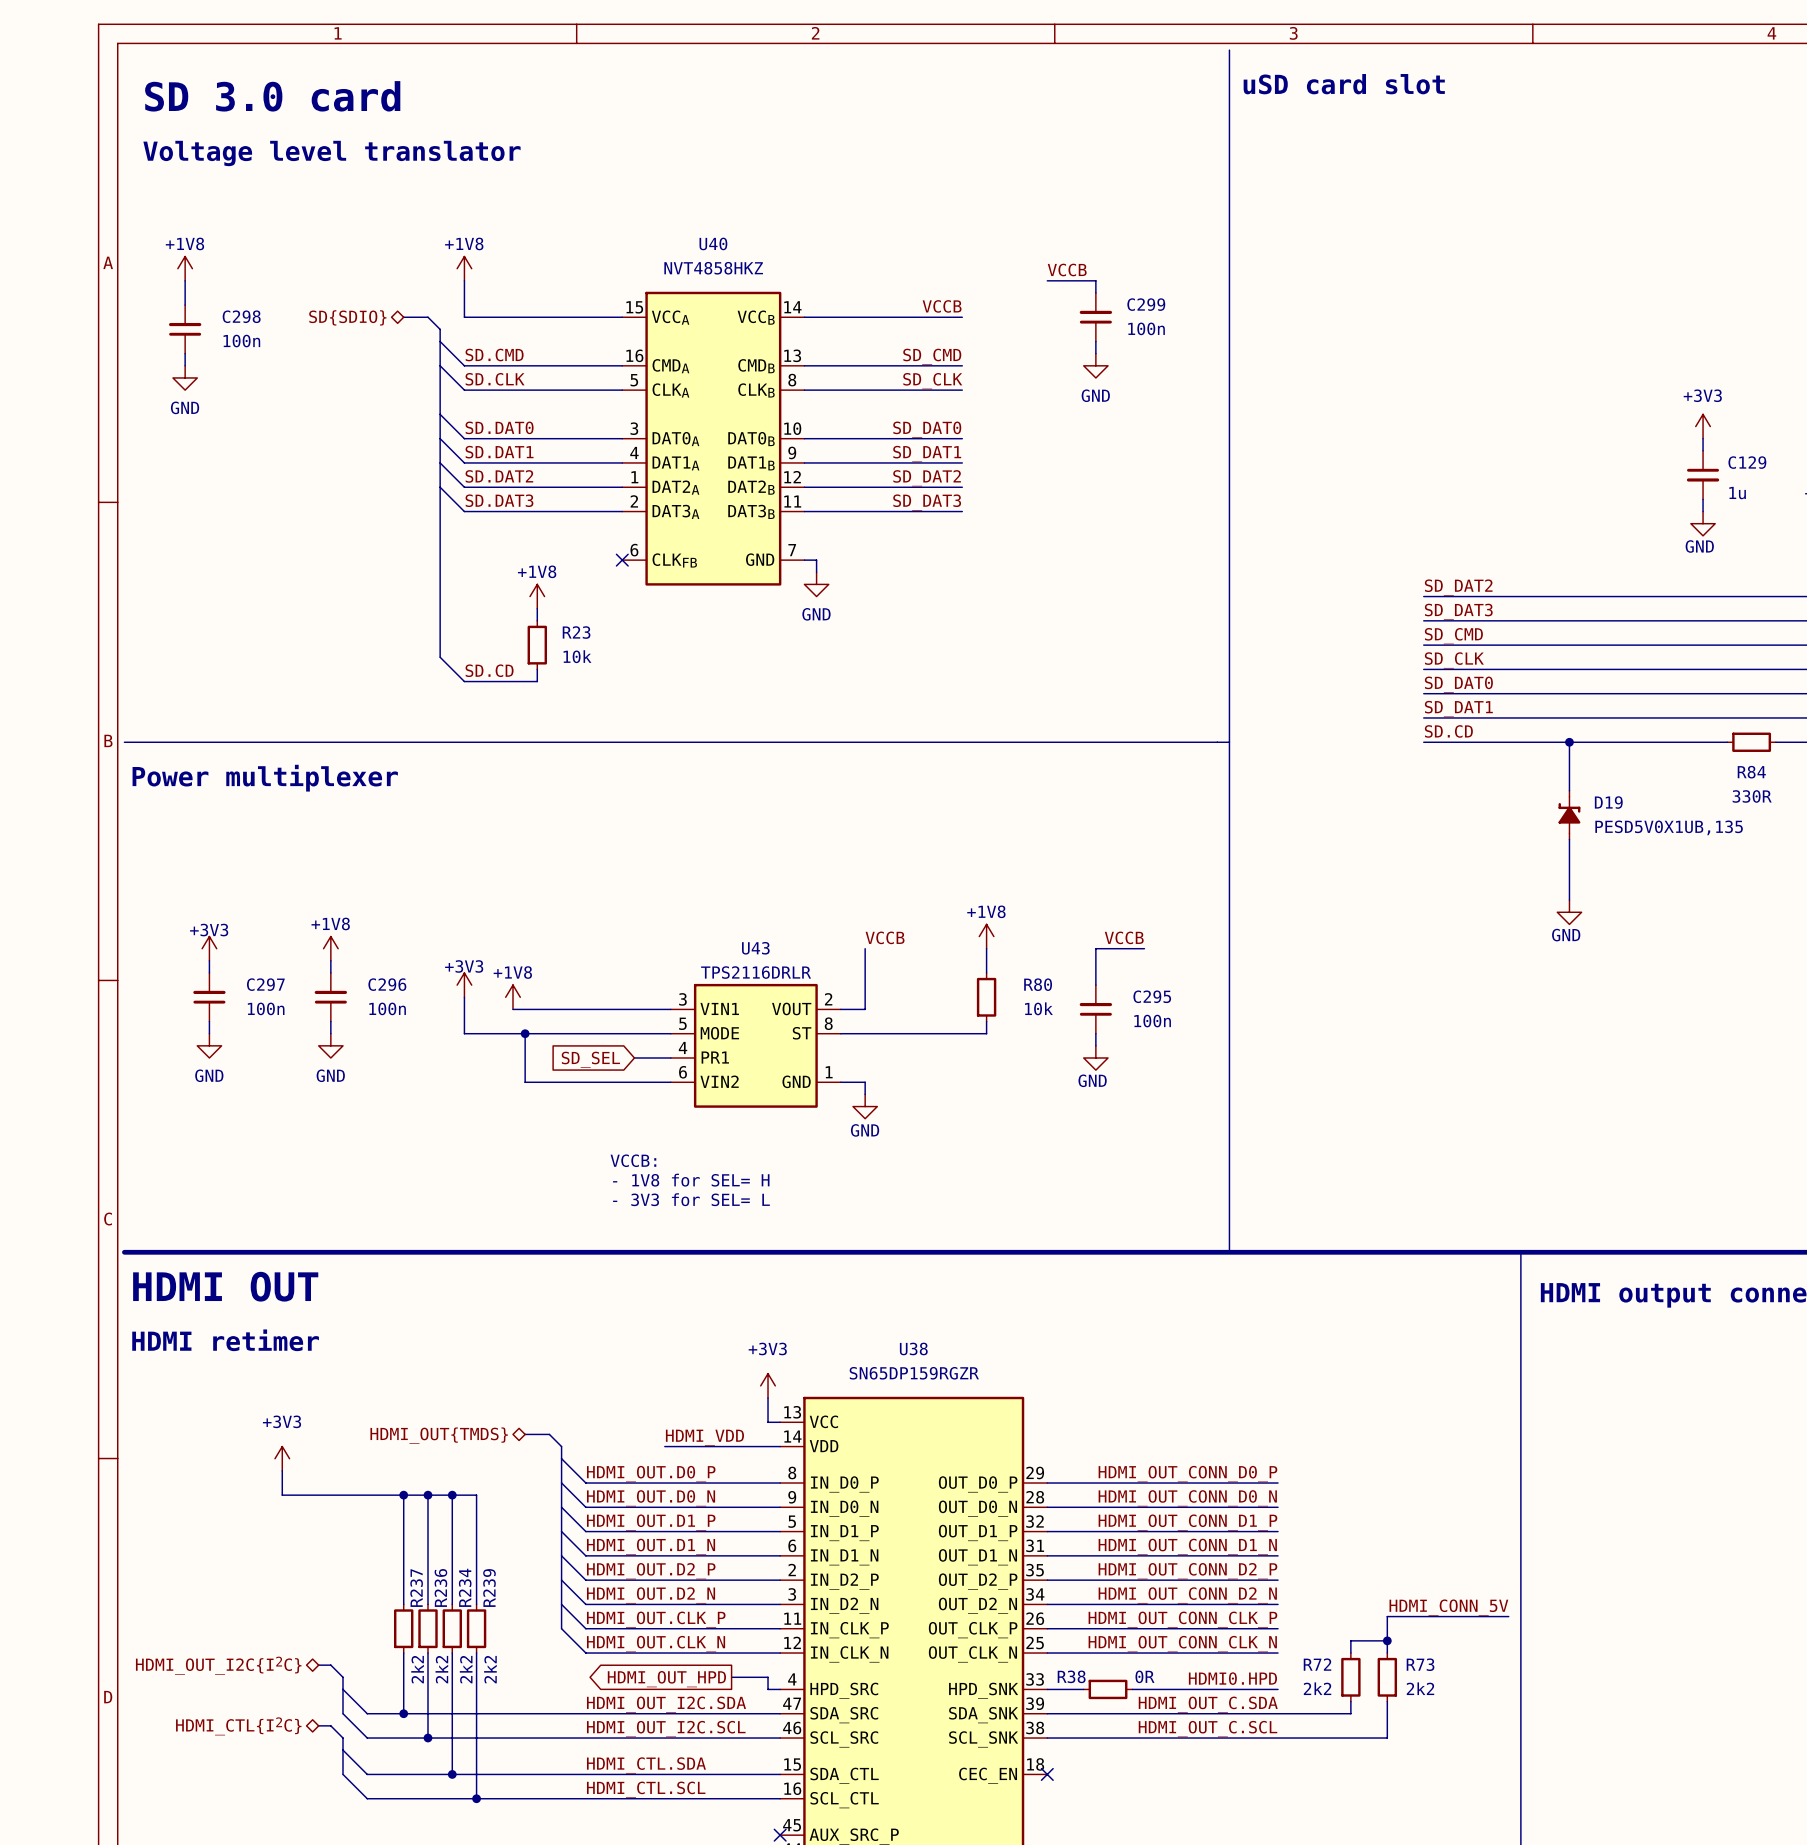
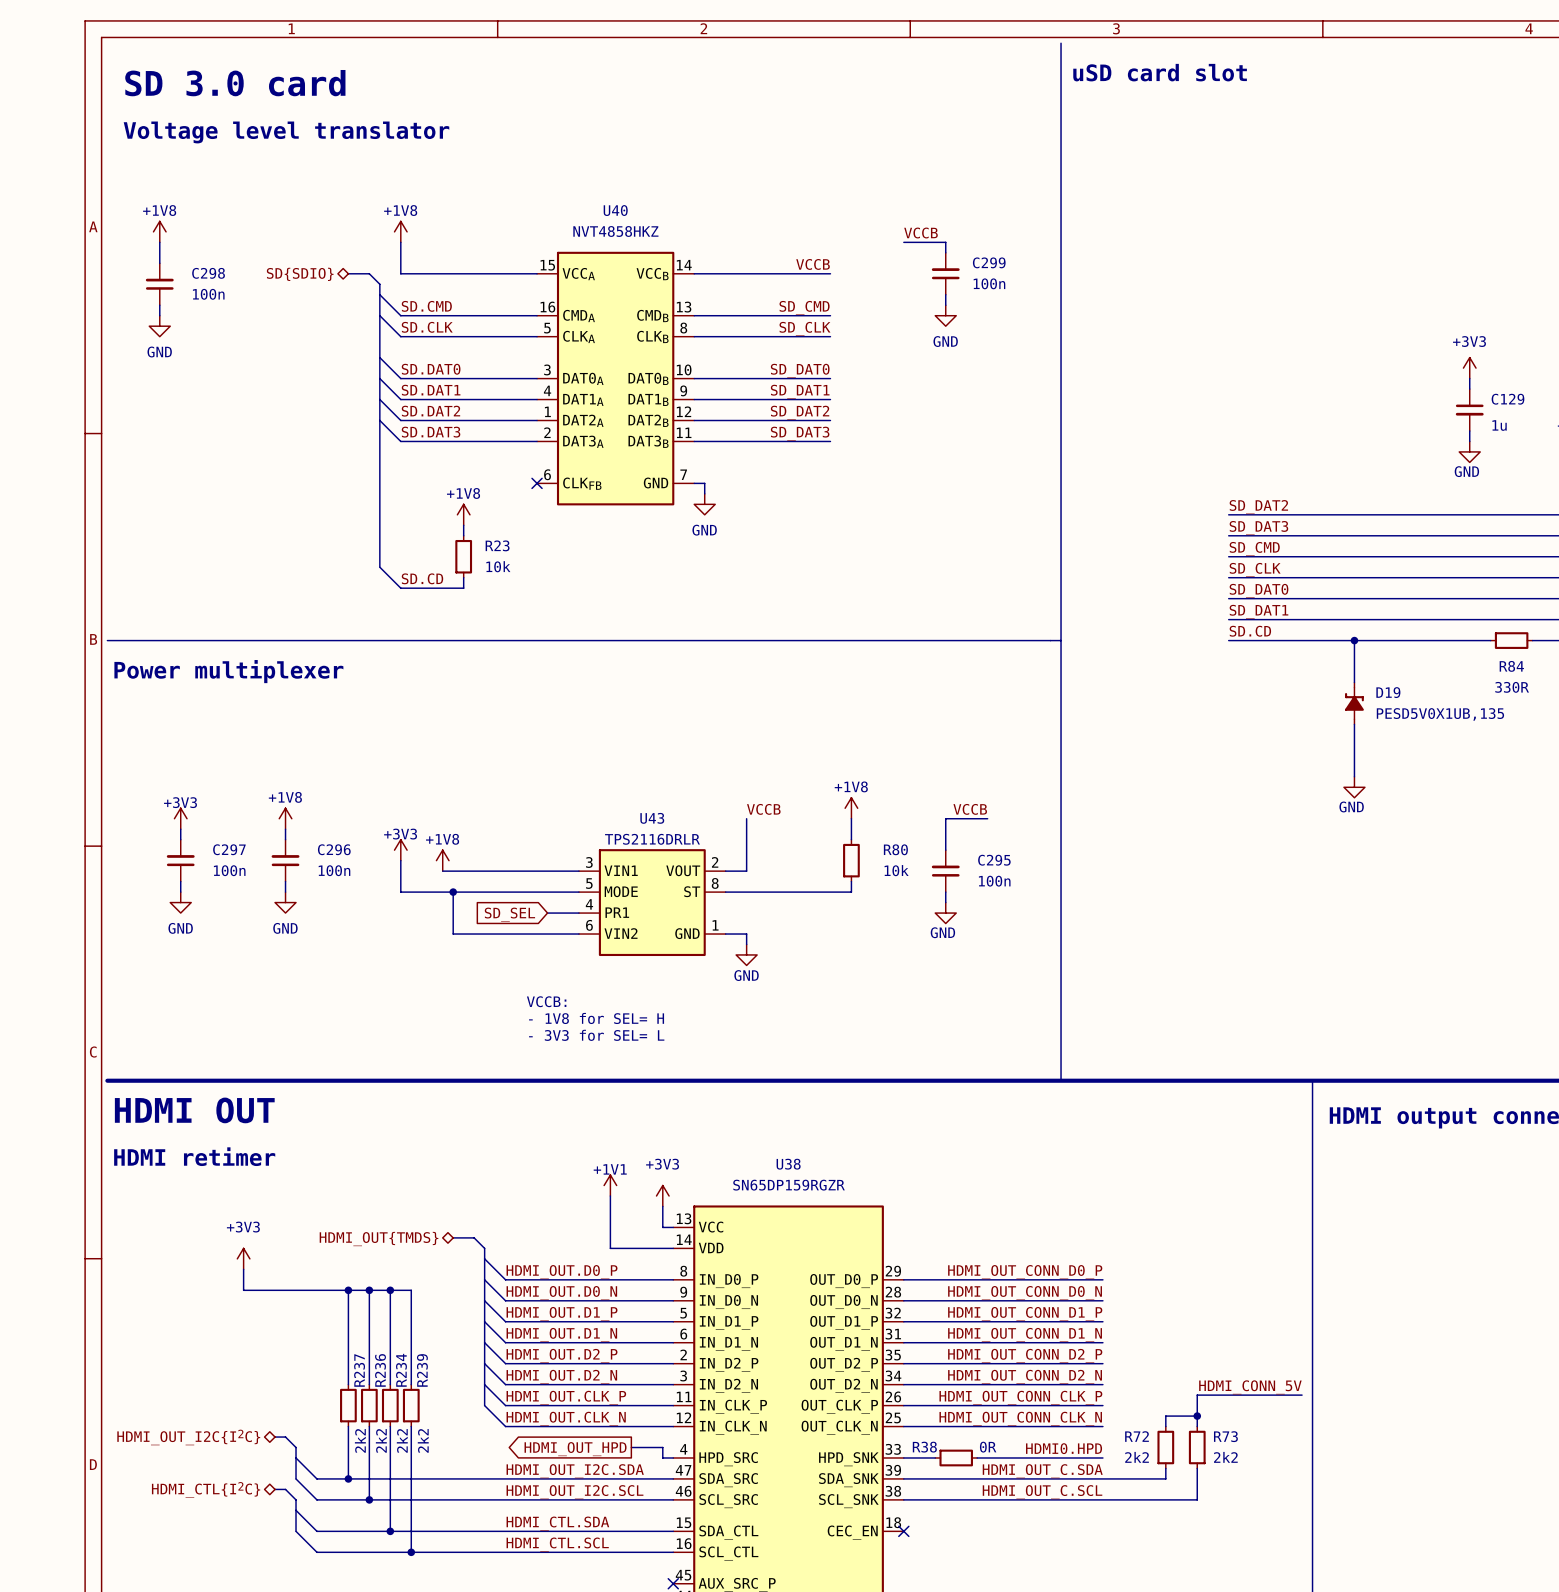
power symbol: none -> +1V1 (610, 1185)
label: HDMI_VDD (704, 1437) -> none
wire: (664, 1446) (707, 1446) -> (610, 1196) (610, 1248)

